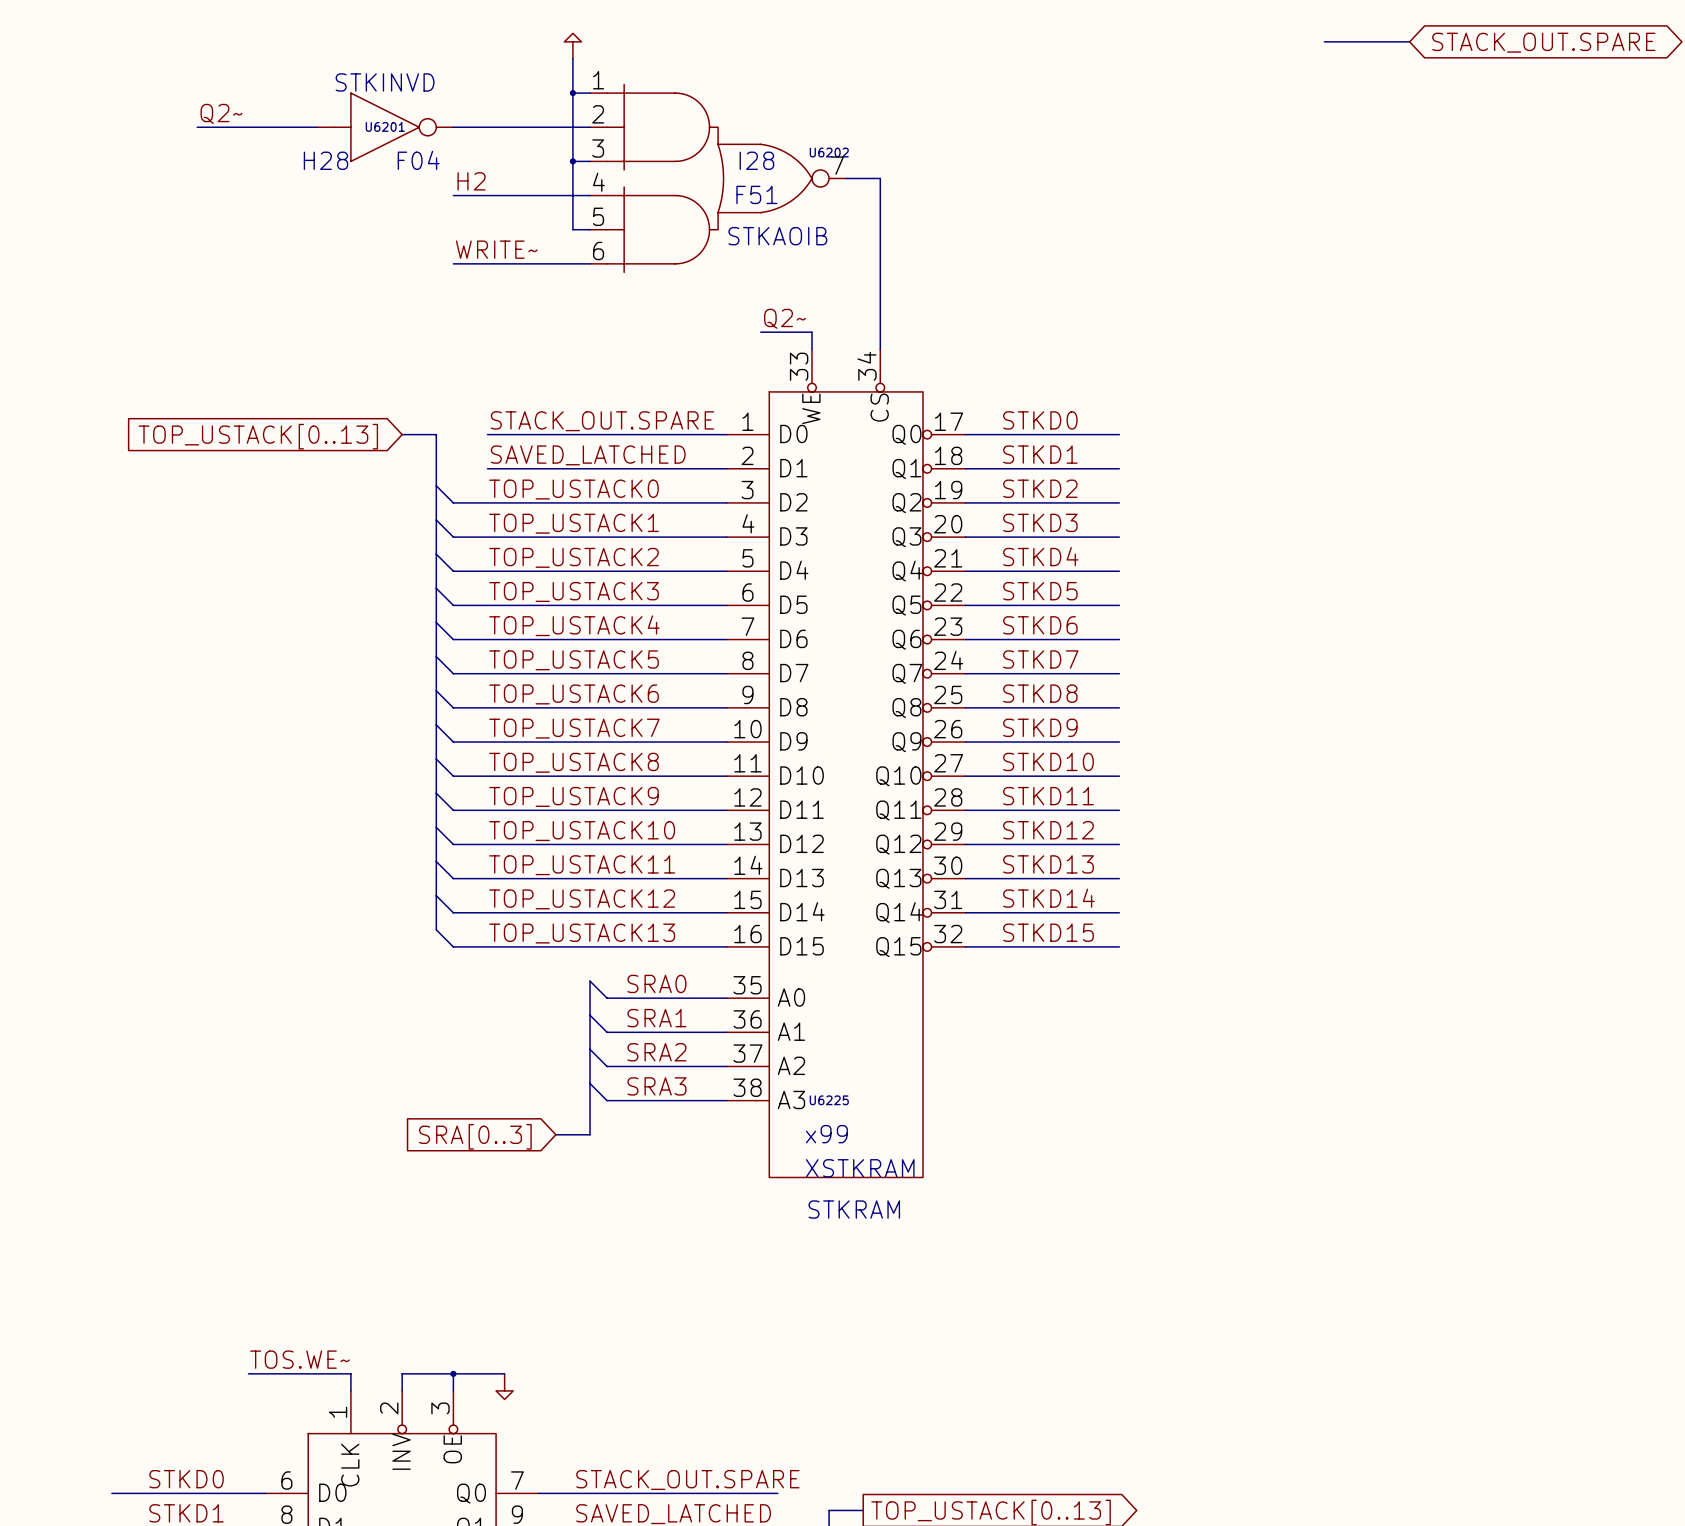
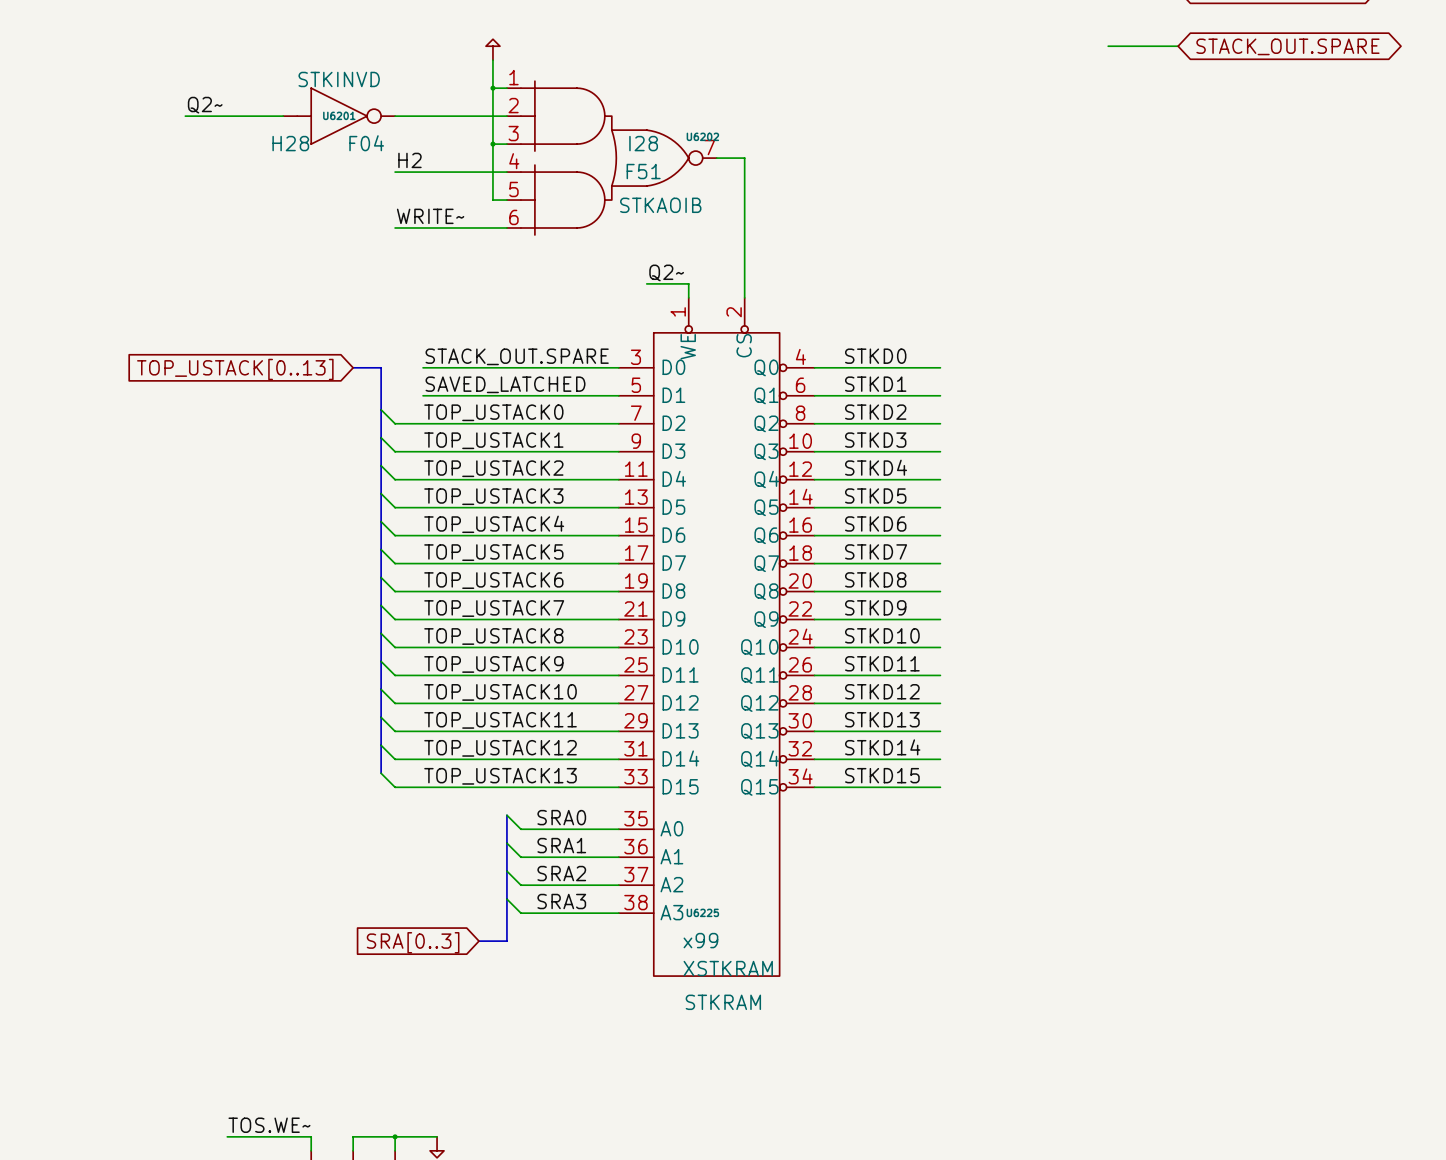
U6225 symbol: [726, 349, 966, 1178] -> [618, 297, 815, 977]

